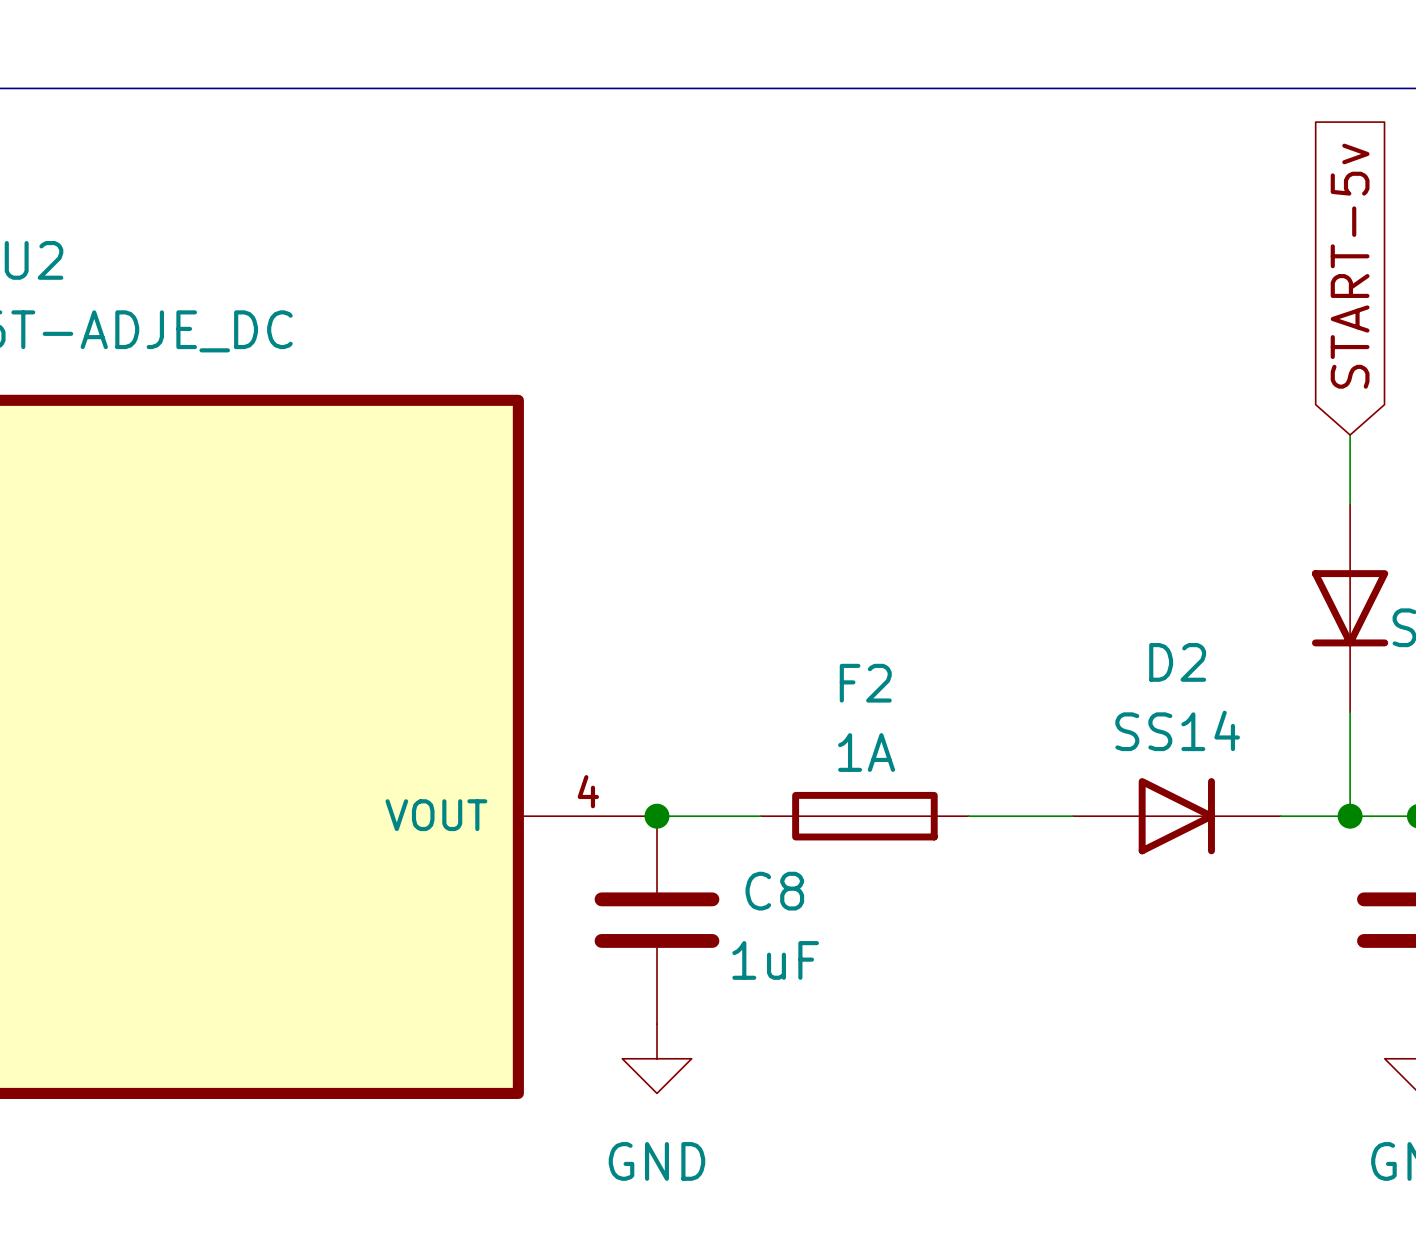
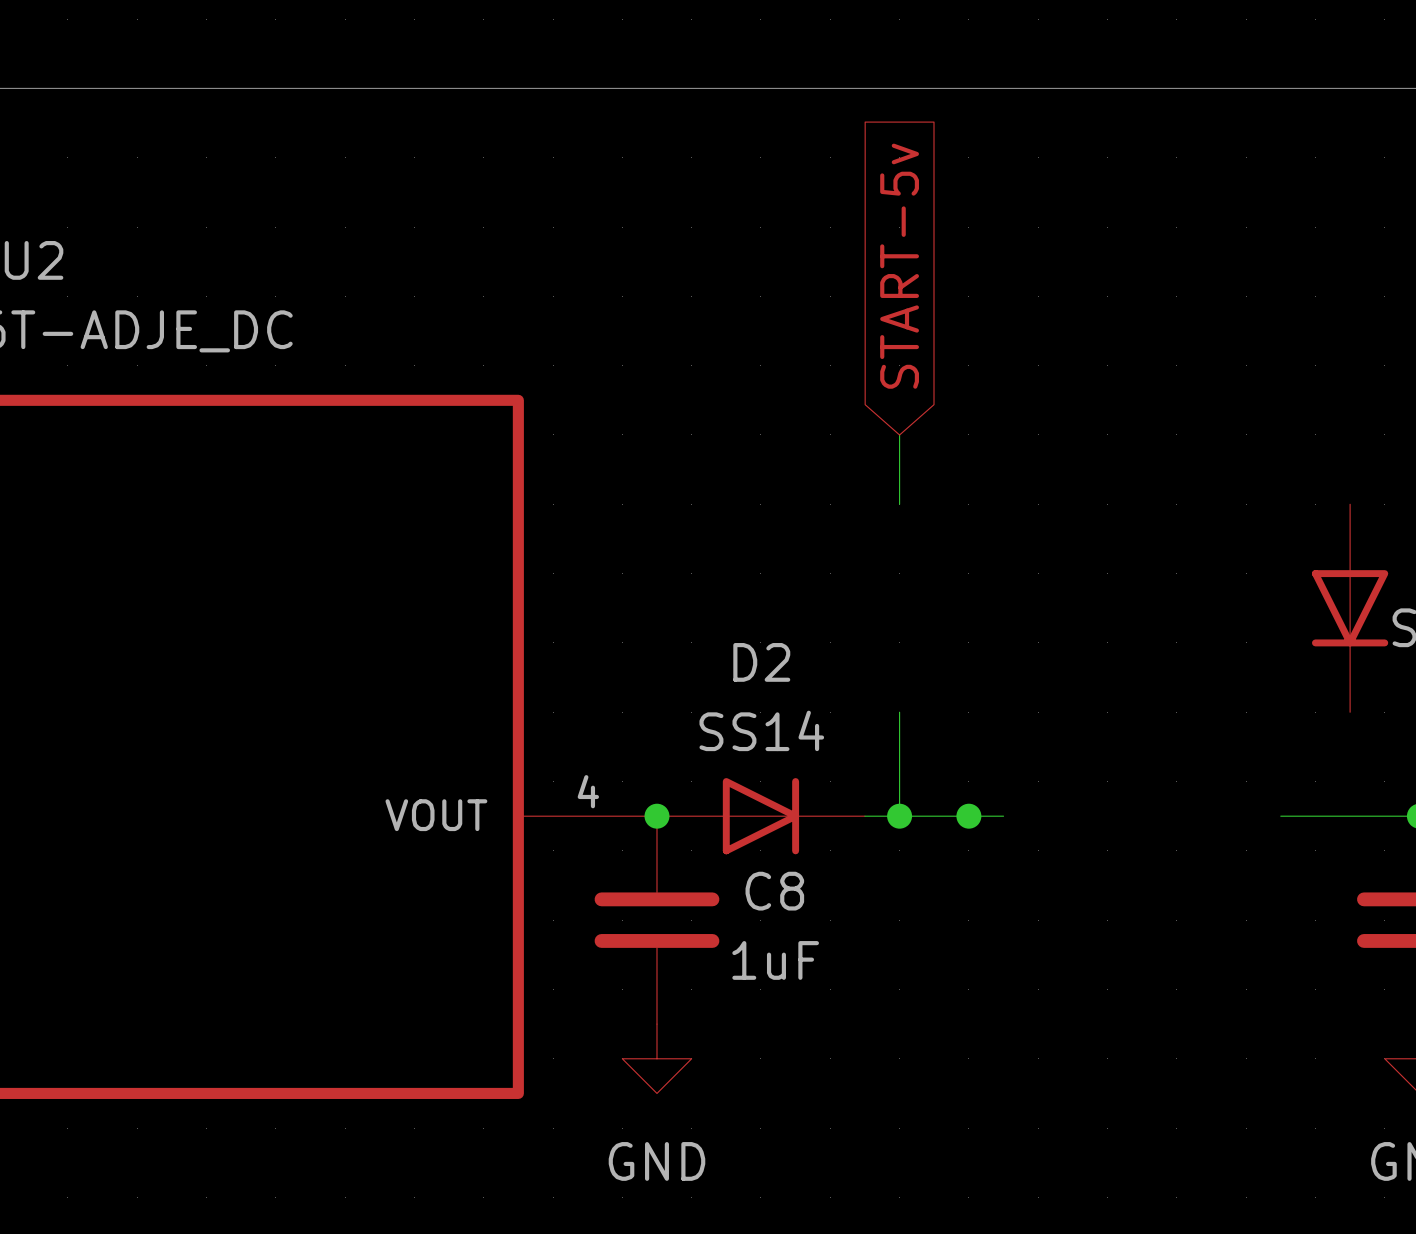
global label position: START-5v (1350, 266) -> START-5v (899, 266)
wire: (1350, 434) (1350, 504) -> (899, 434) (899, 504)
wire: (1350, 712) (1350, 816) -> (899, 712) (899, 816)
F2: 1A (864, 816) -> none
junction: none -> (899, 816)
junction: none -> (968, 816)
wire: (1003, 816) (1072, 816) -> none
D2 position: (1176, 816) -> (760, 816)
junction: (1350, 816) -> none

